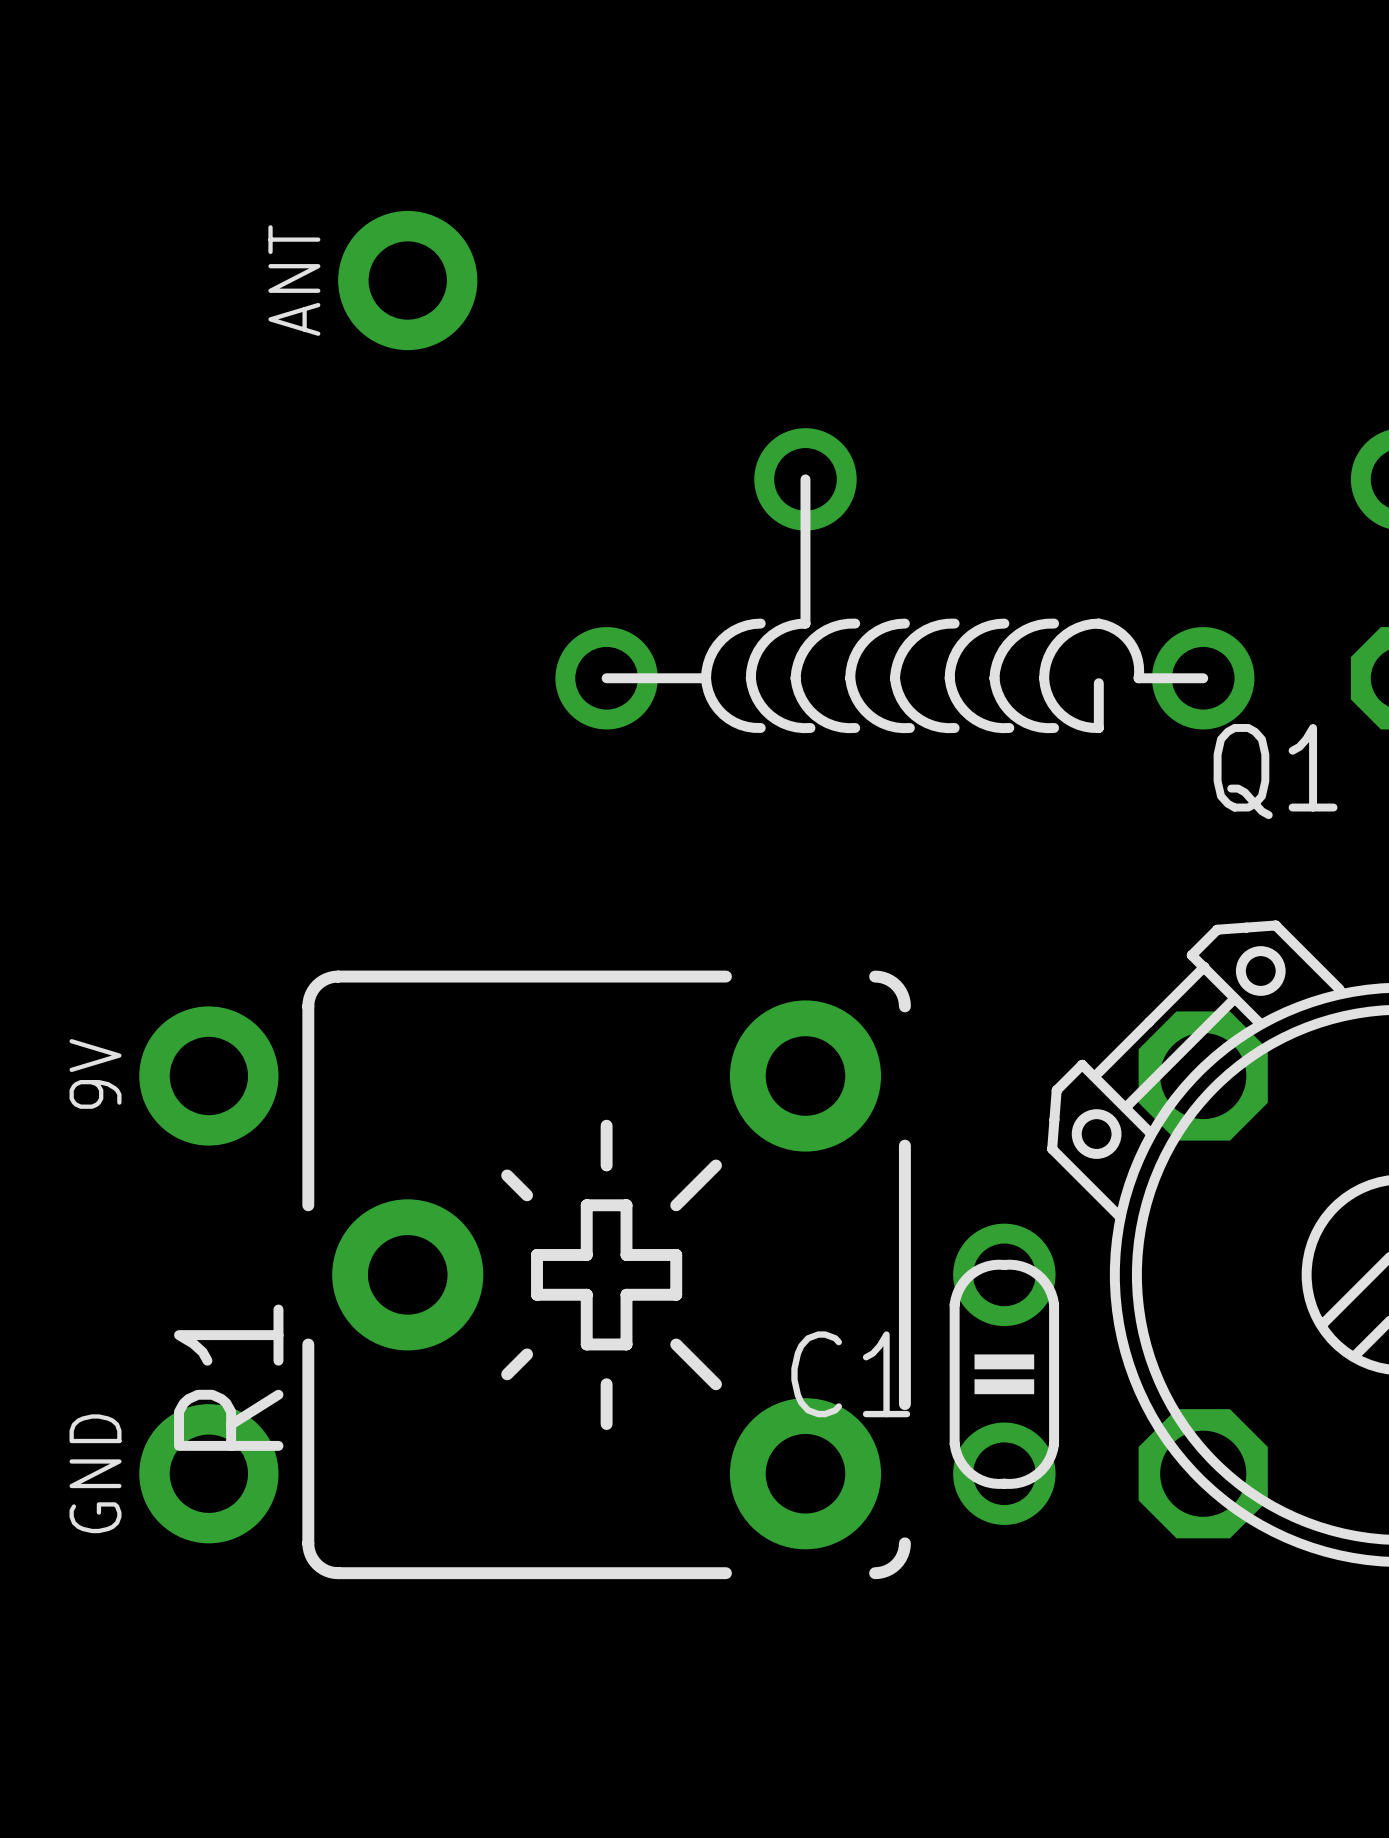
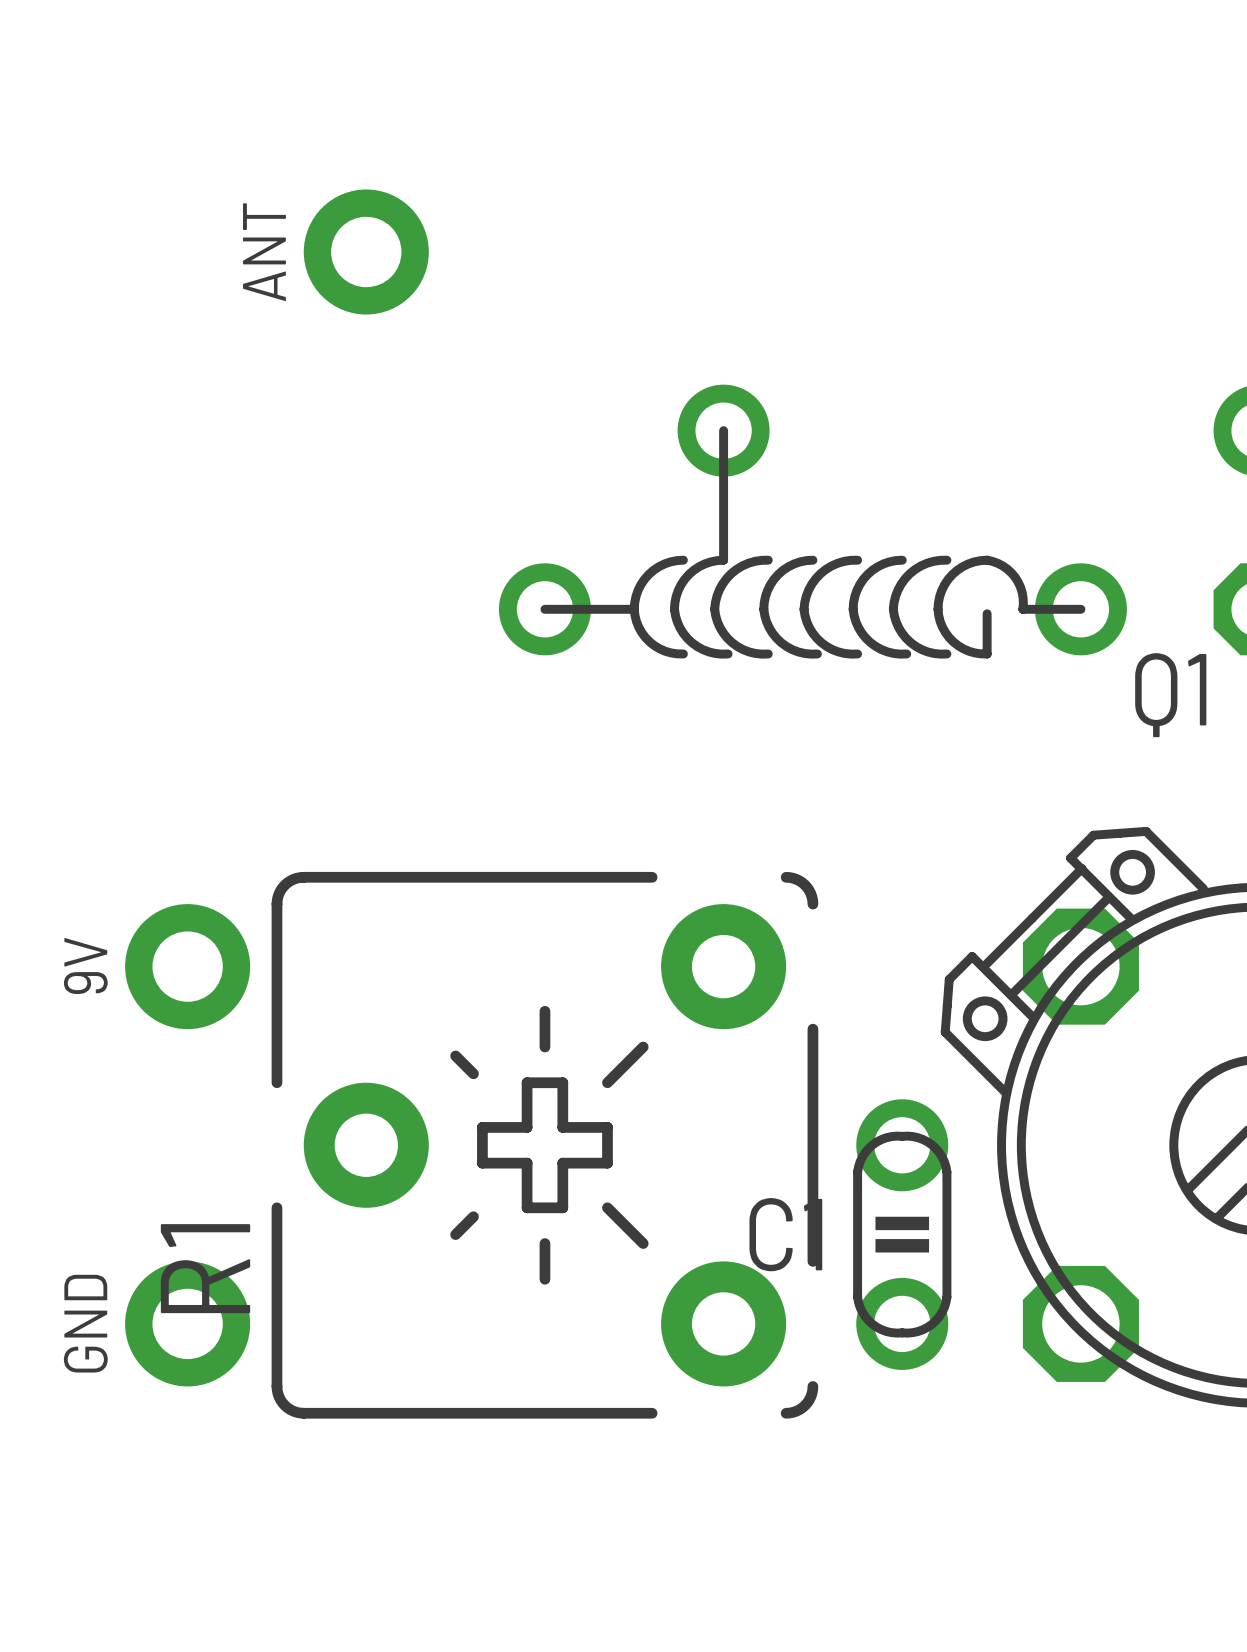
R1 footprint: [302, 970, 911, 1580] -> [271, 871, 819, 1419]

